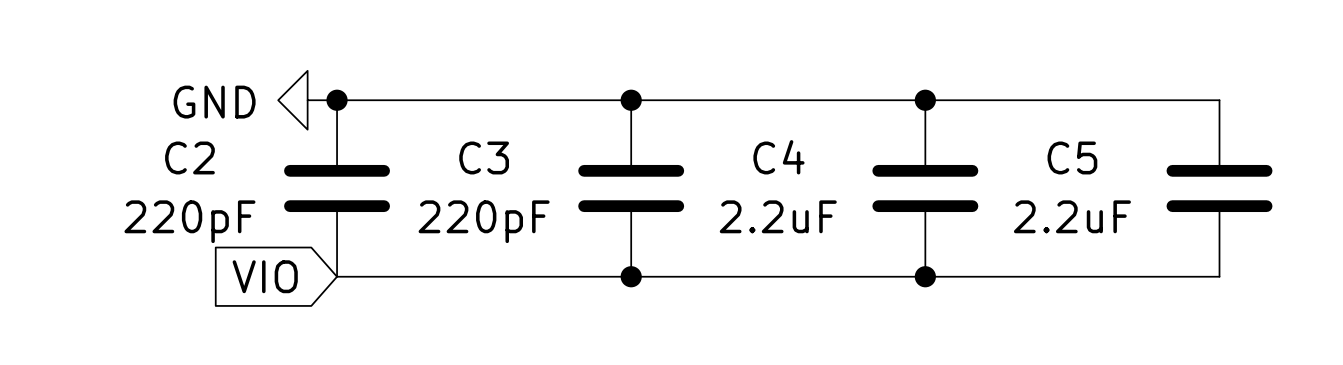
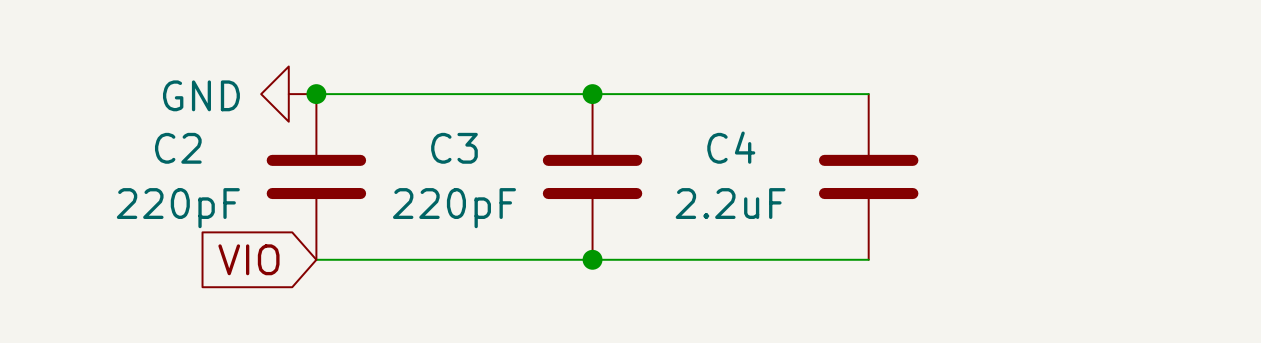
wire: (925, 100) (1219, 100) -> none
junction: (925, 100) -> none
C5: 2.2uF (1219, 188) -> none
wire: (925, 276) (1219, 276) -> none
junction: (925, 276) -> none

